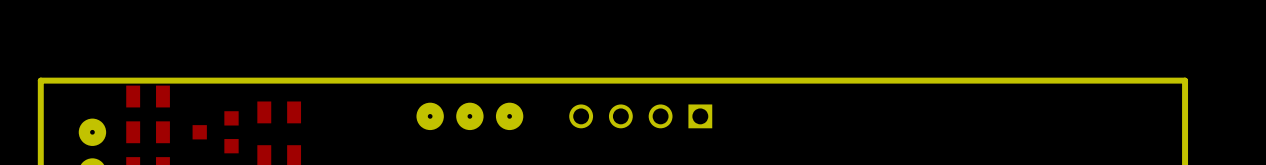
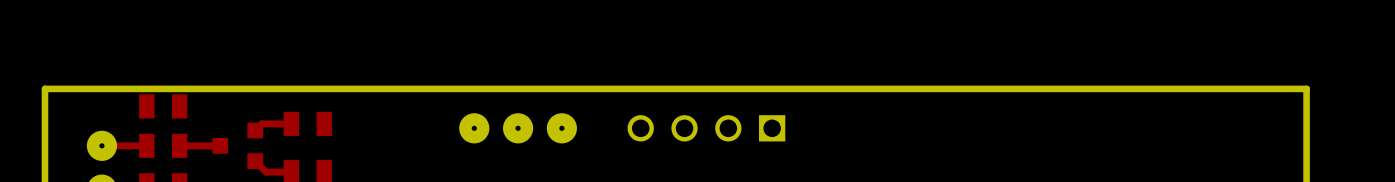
top track: none -> (291, 123) (261, 123) (255, 130)
top track: none -> (146, 145) (101, 145)
top track: none -> (220, 145) (179, 145)
top track: none -> (255, 161) (266, 172) (291, 172)

